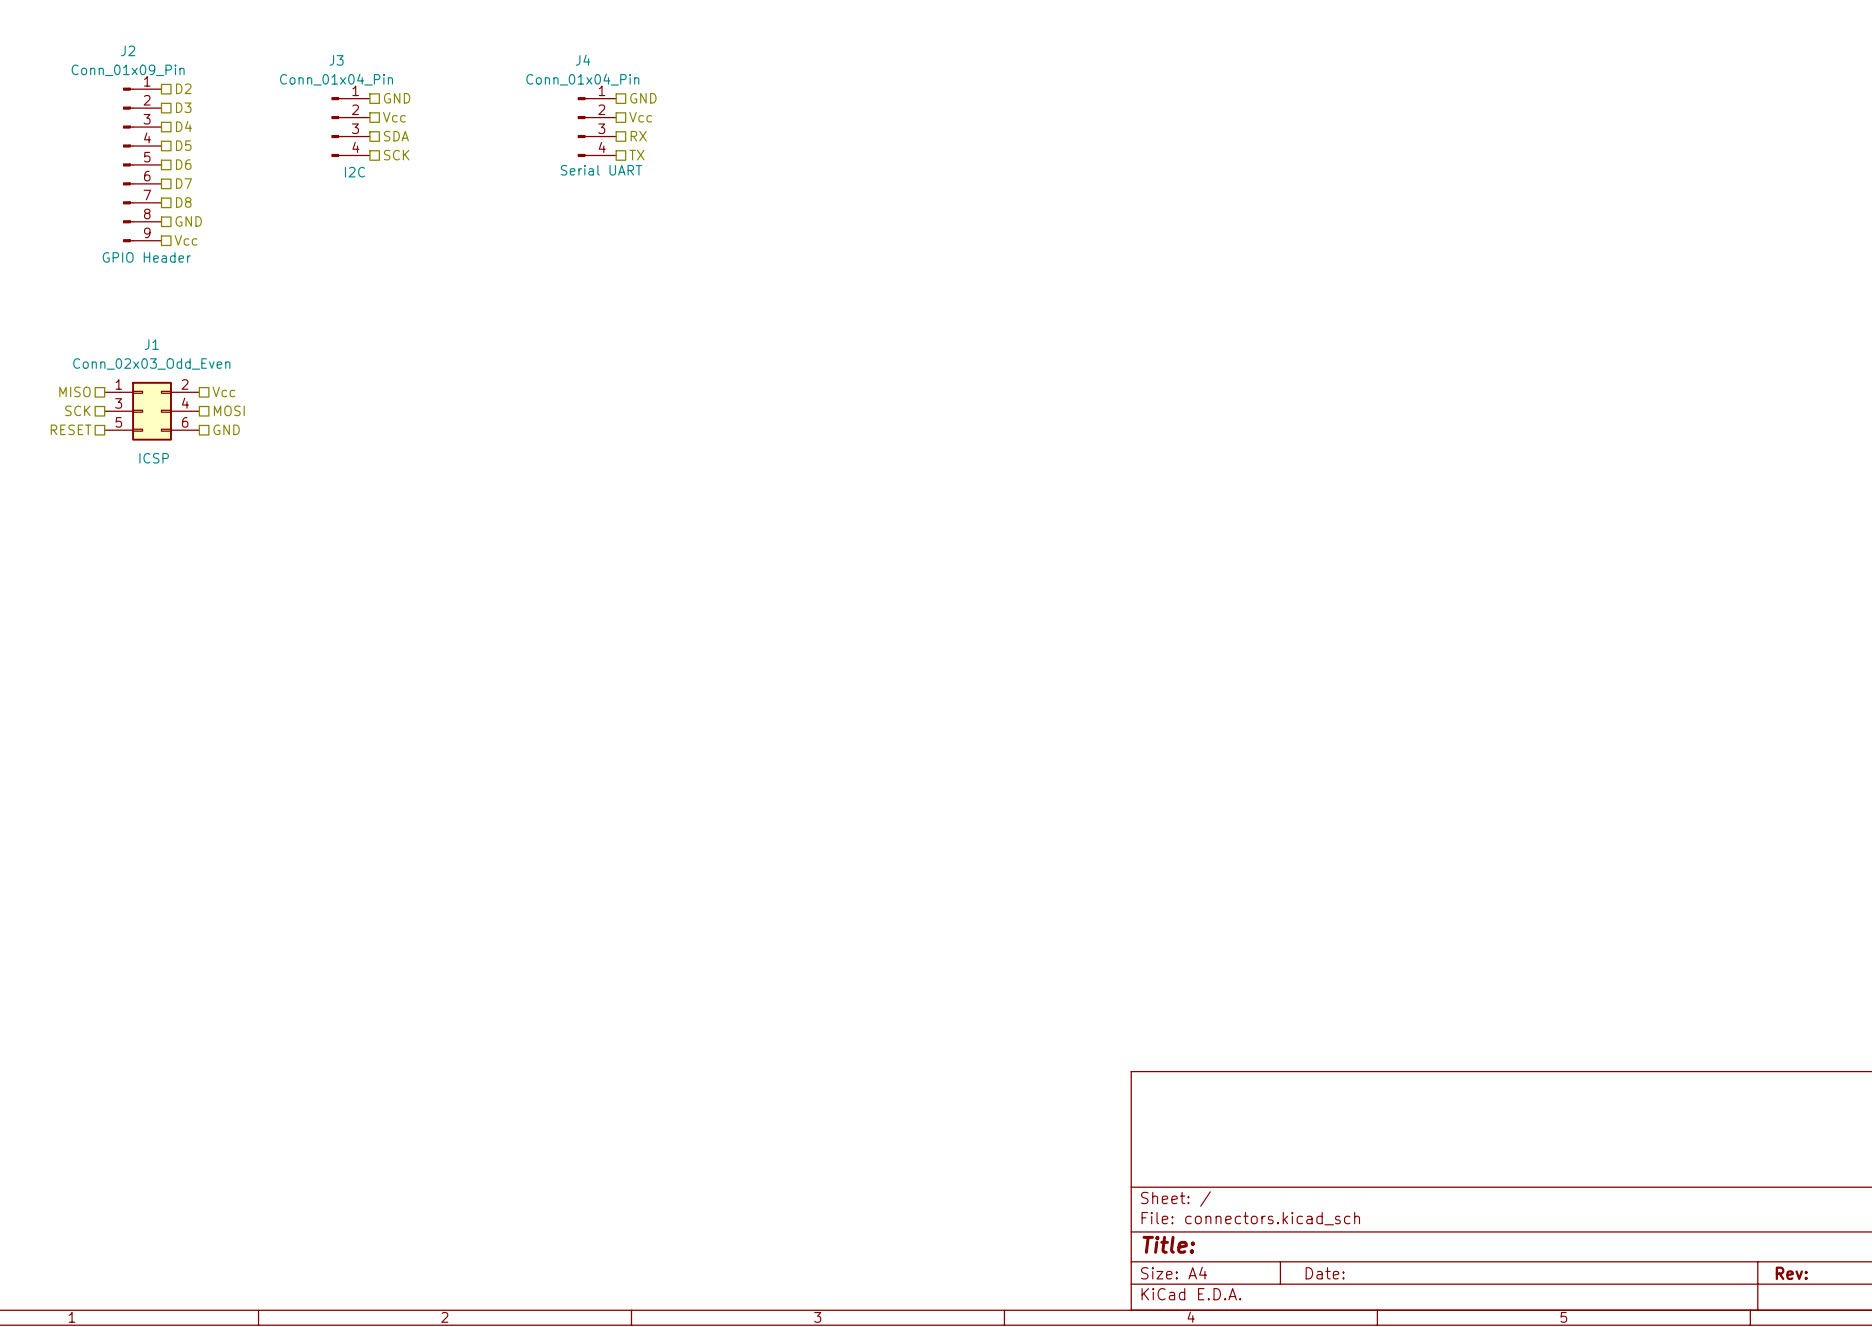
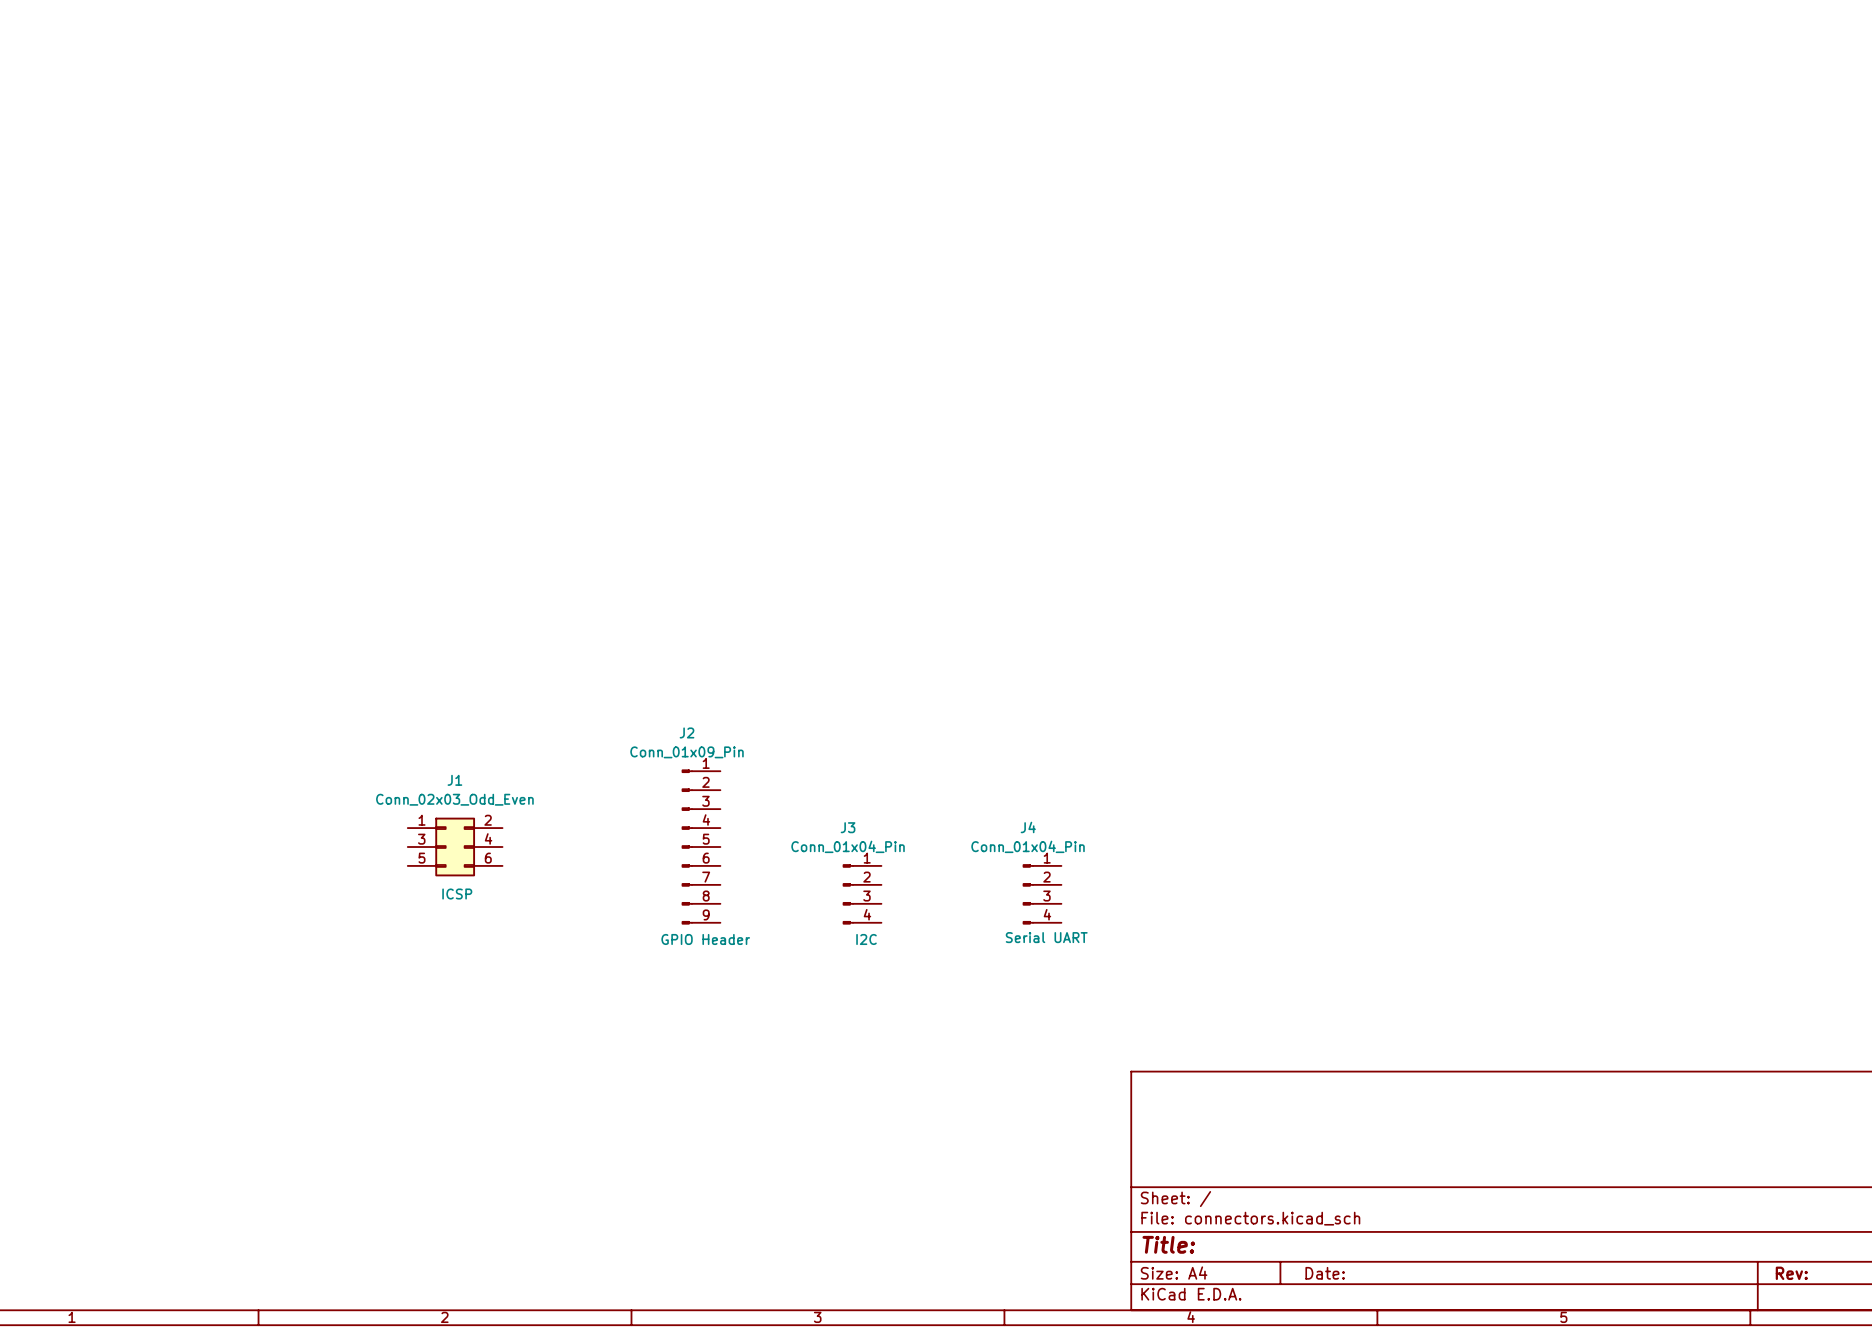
hierarchical label: D2 (183, 88) -> none
hierarchical label: GND (397, 98) -> none
hierarchical label: GND (643, 98) -> none
hierarchical label: D3 (183, 107) -> none
hierarchical label: Vcc (394, 117) -> none
hierarchical label: Vcc (640, 117) -> none
hierarchical label: D4 (183, 126) -> none
J3 position: (350, 127) -> (862, 894)
J4 position: (596, 127) -> (1042, 894)
hierarchical label: SDA (396, 136) -> none
hierarchical label: RX (638, 136) -> none
hierarchical label: D5 (183, 145) -> none
hierarchical label: SCK (396, 155) -> none
hierarchical label: TX (636, 155) -> none
J2 position: (142, 164) -> (701, 847)
hierarchical label: D6 (183, 164) -> none
hierarchical label: D7 (183, 183) -> none
hierarchical label: D8 (183, 202) -> none
hierarchical label: GND (188, 221) -> none
hierarchical label: Vcc (186, 240) -> none
hierarchical label: MISO (74, 391) -> none
hierarchical label: Vcc (223, 391) -> none
hierarchical label: SCK (77, 410) -> none
hierarchical label: MOSI (229, 410) -> none
J1 position: (152, 411) -> (455, 847)
hierarchical label: RESET (71, 429) -> none
hierarchical label: GND (226, 429) -> none

